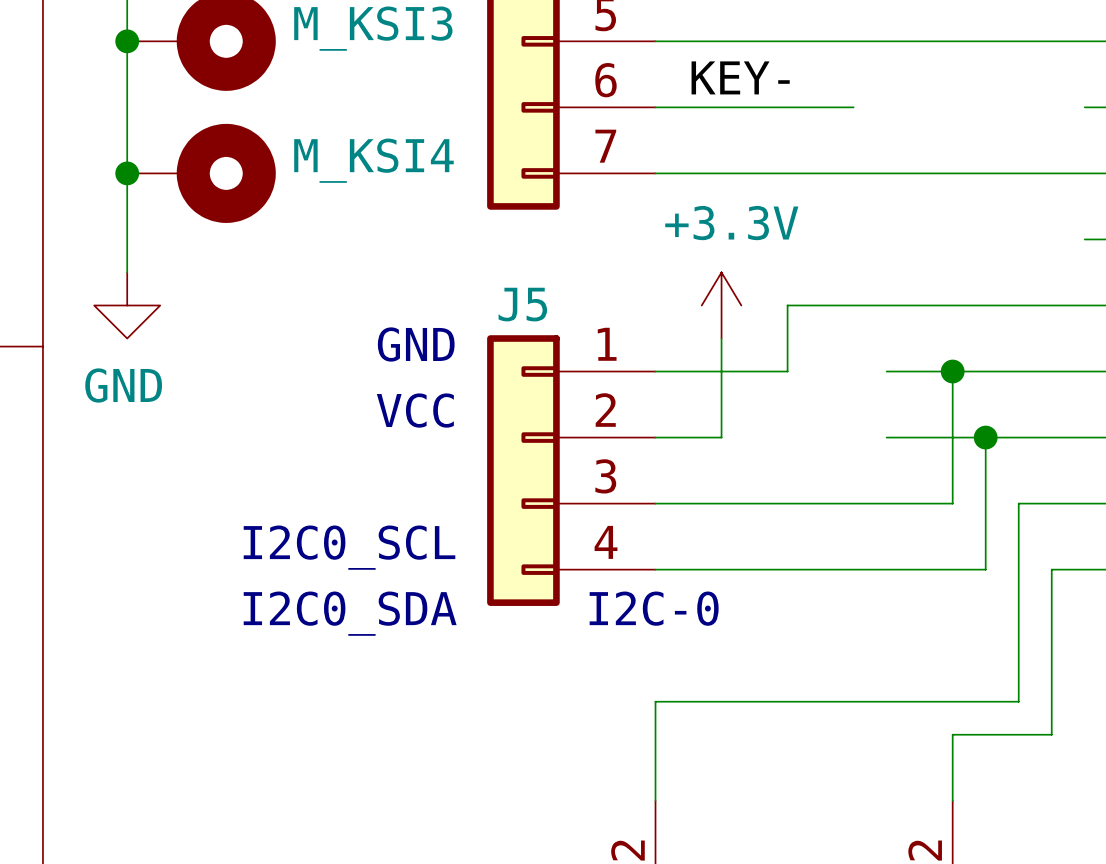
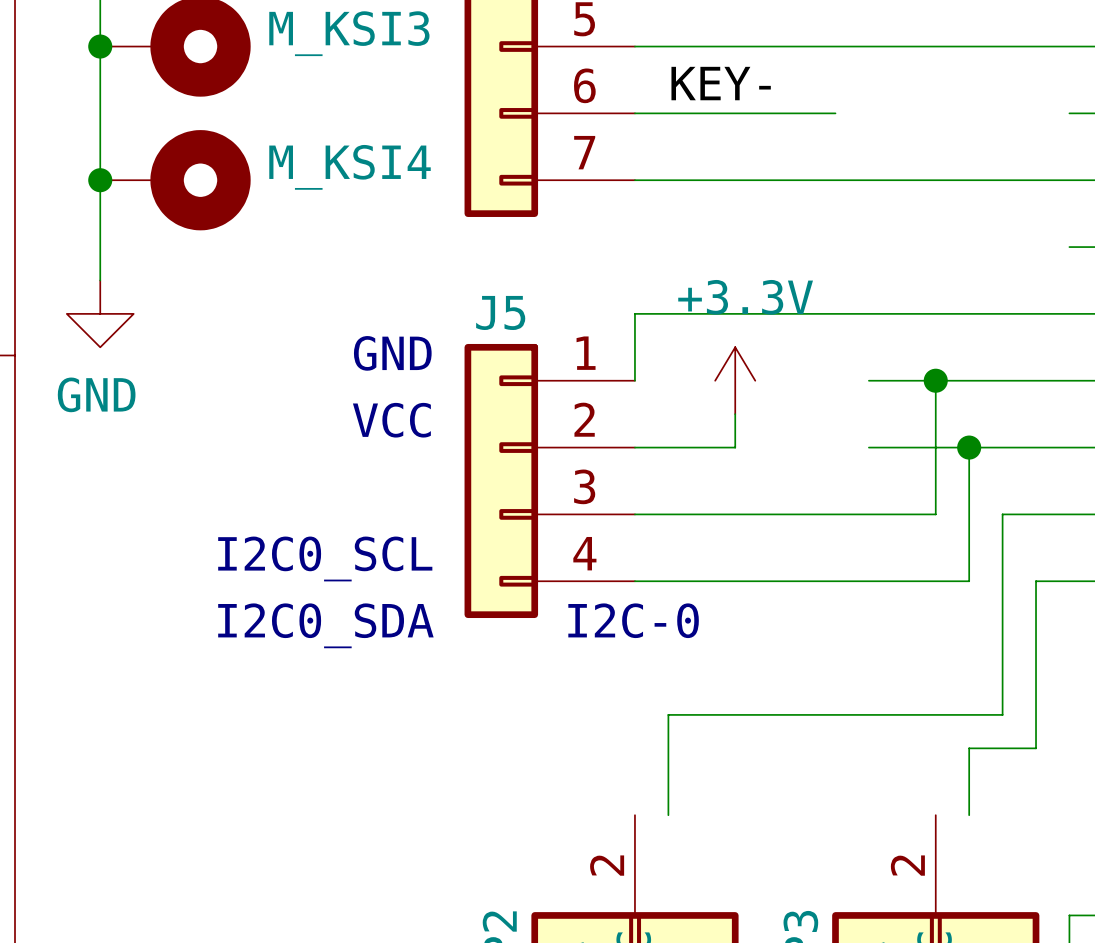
power symbol position: +3.3V (721, 305) -> +3.3V (735, 380)
wire: (787, 305) (787, 371) (655, 371) -> (768, 313) (634, 313) (634, 380)
wire: (721, 338) (721, 437) -> (735, 414) (735, 447) (701, 447)
wire: (688, 701) (655, 701) (655, 800) -> (668, 714) (668, 815)
wire: (985, 734) (952, 734) (952, 800) -> (969, 748) (969, 815)

